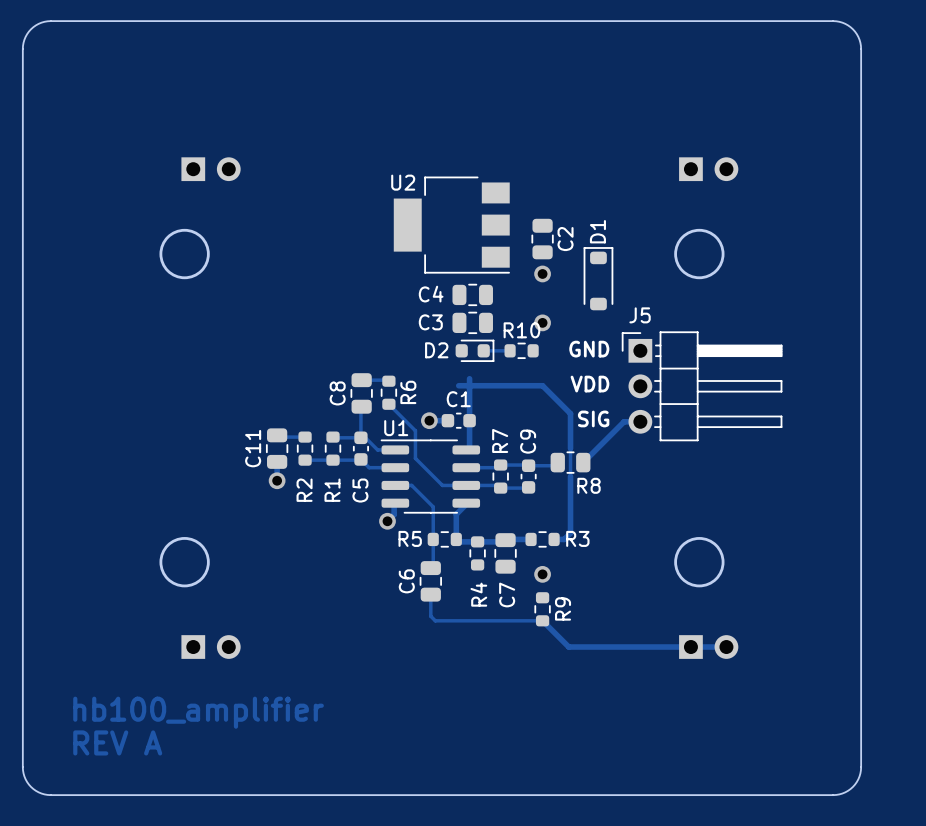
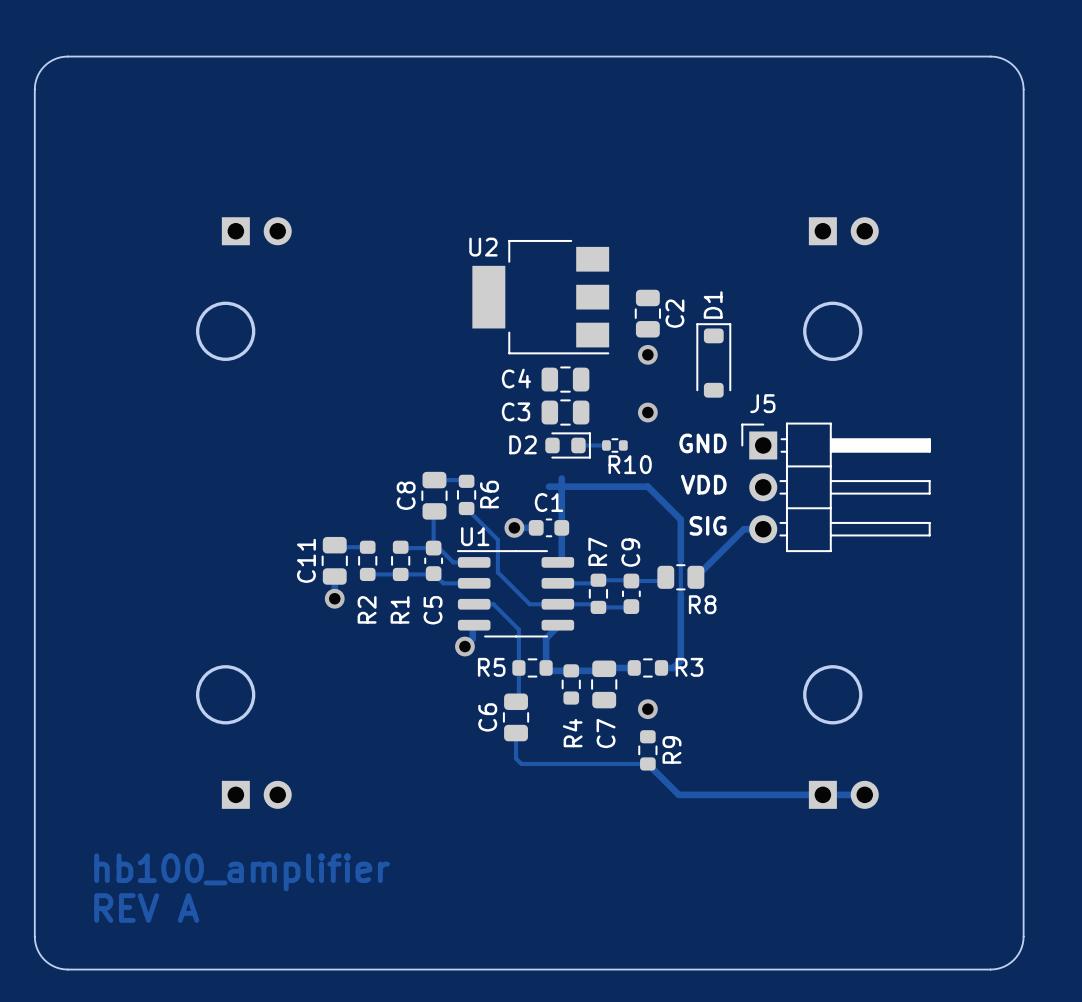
R10 name position: R10 (521, 330) -> R10 (630, 464)
R10 footprint: [504, 342, 539, 359] -> [602, 438, 628, 453]

